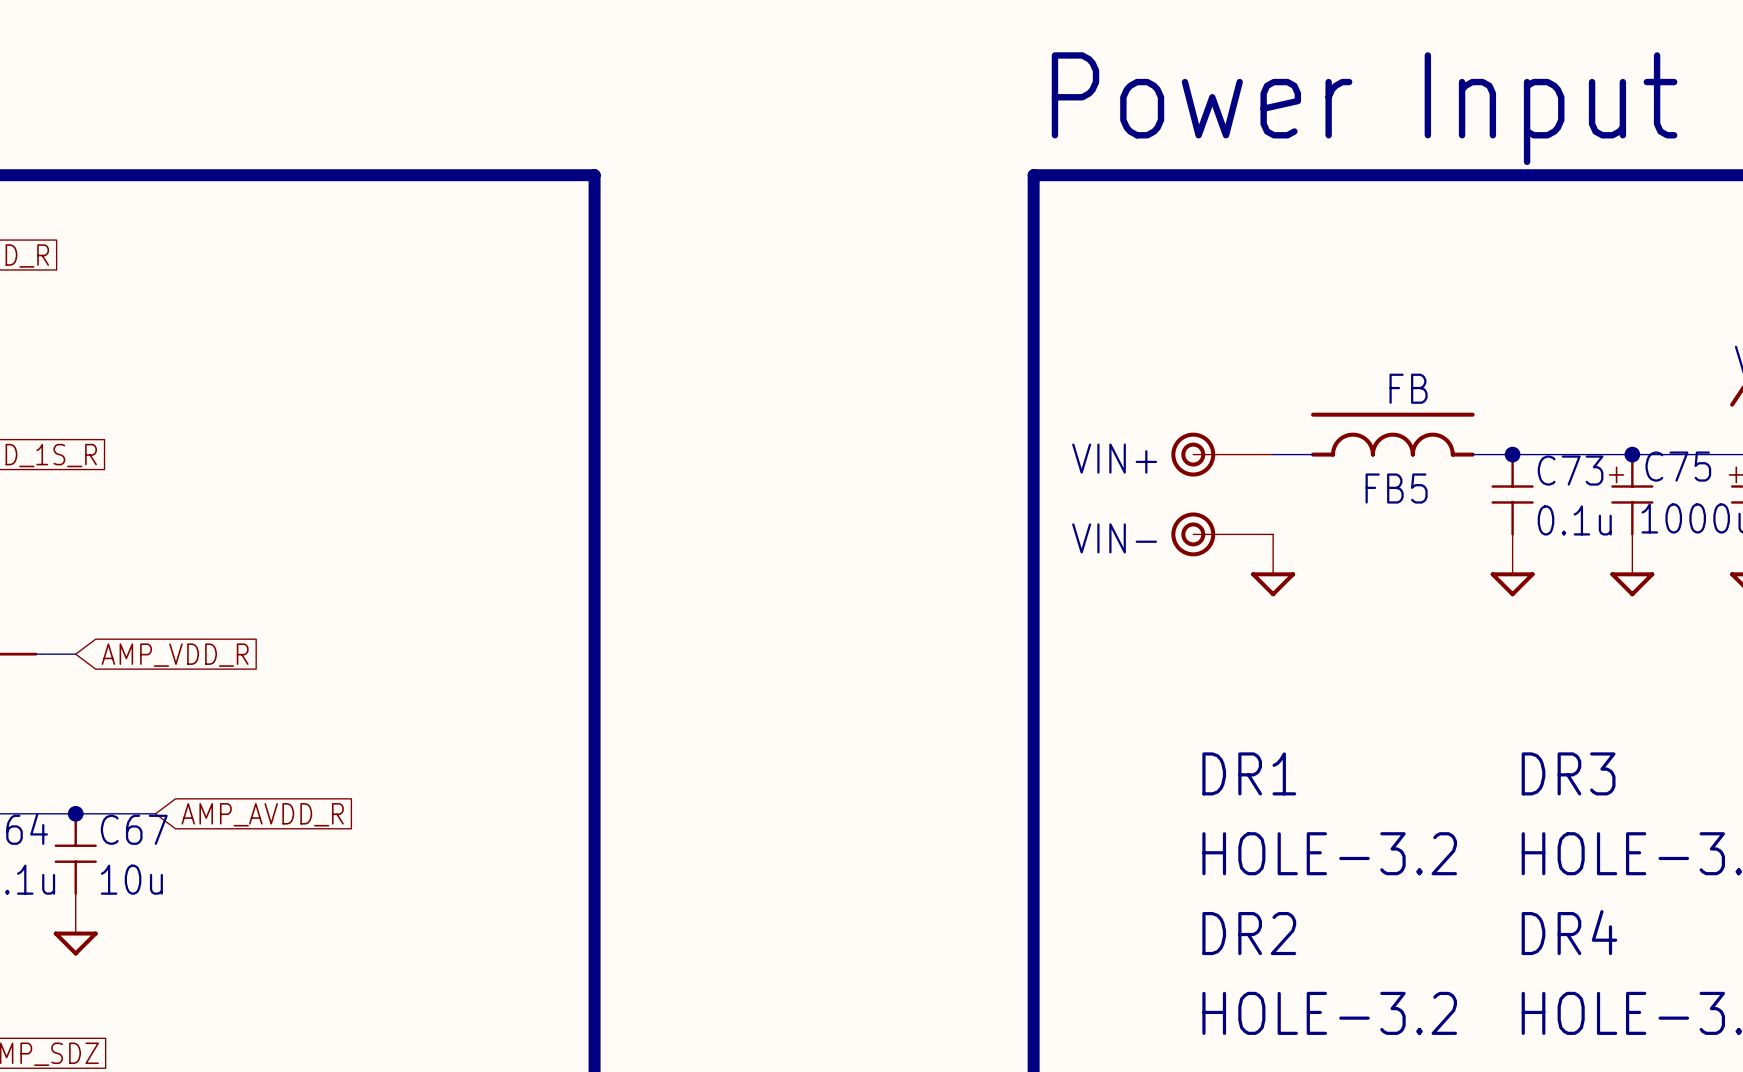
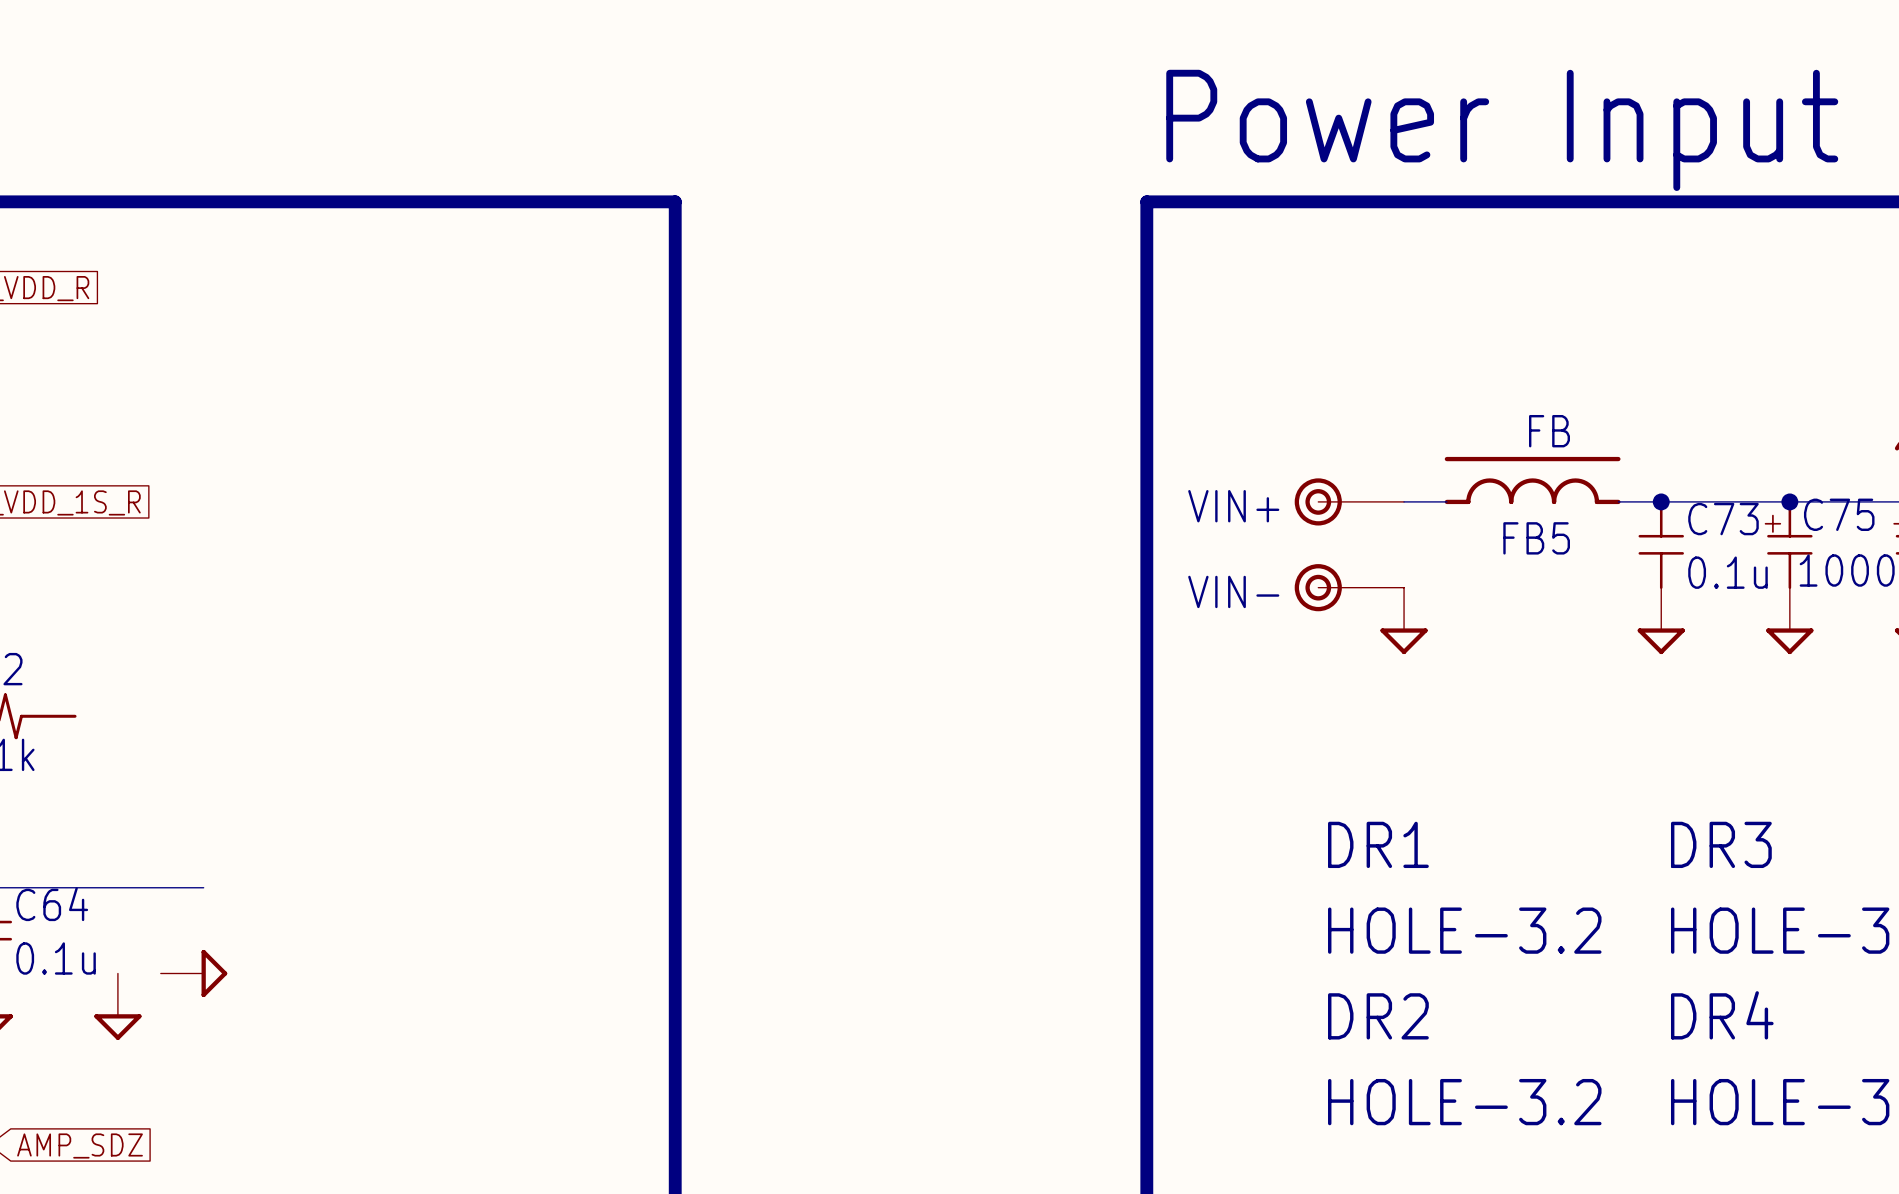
wire: (35, 654) (75, 654) -> none
global label: AMP_VDD_R (175, 655) -> none
junction: (75, 813) -> none
global label: AMP_AVDD_R (262, 814) -> none
C67: 10u (75, 853) -> none
power symbol: none -> (194, 973)

